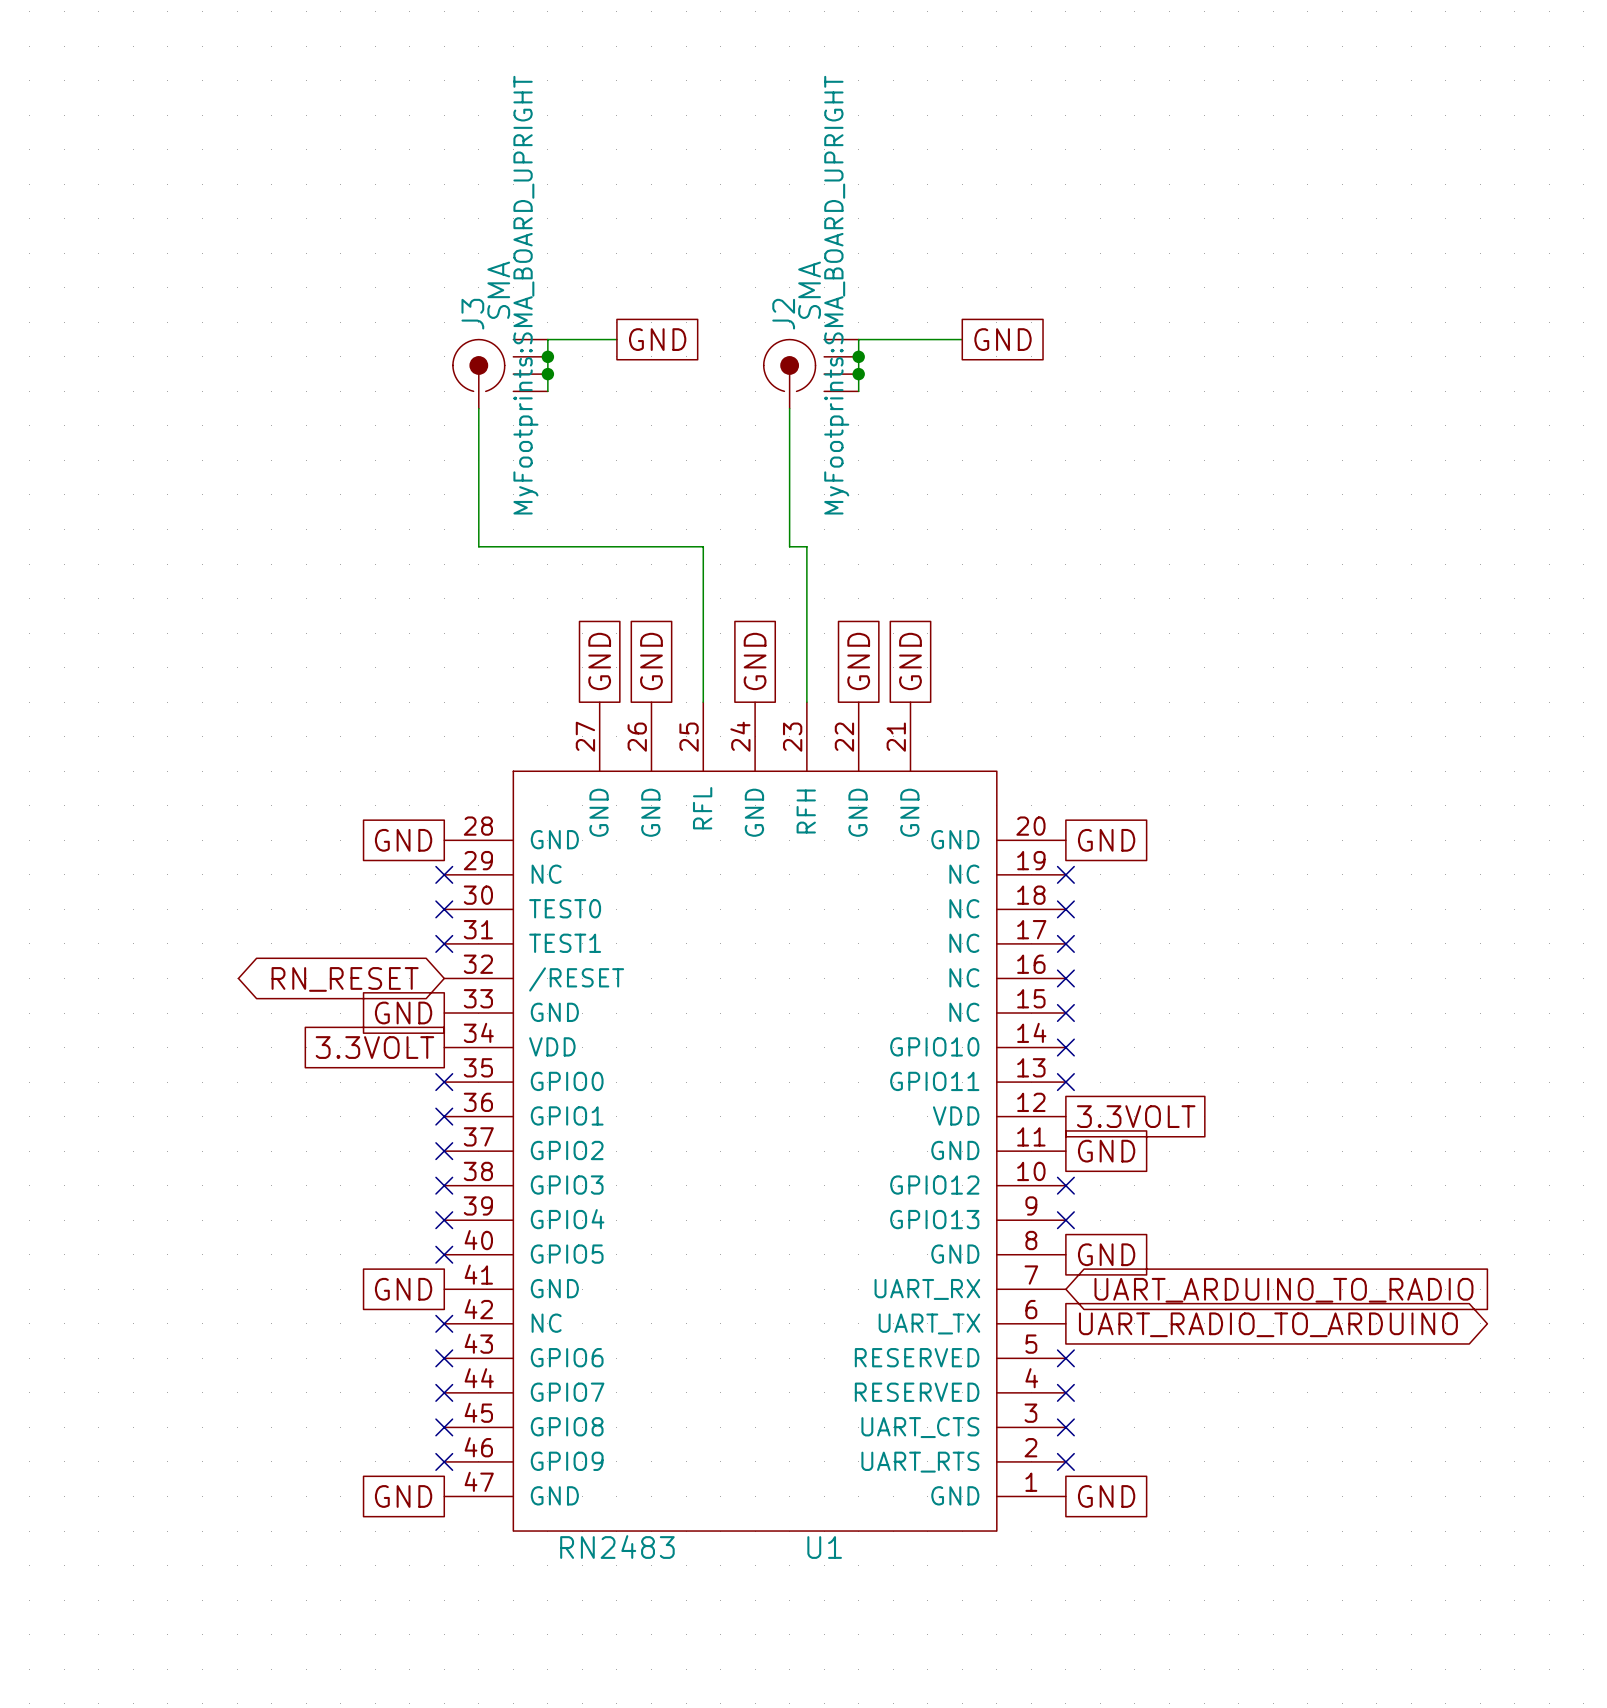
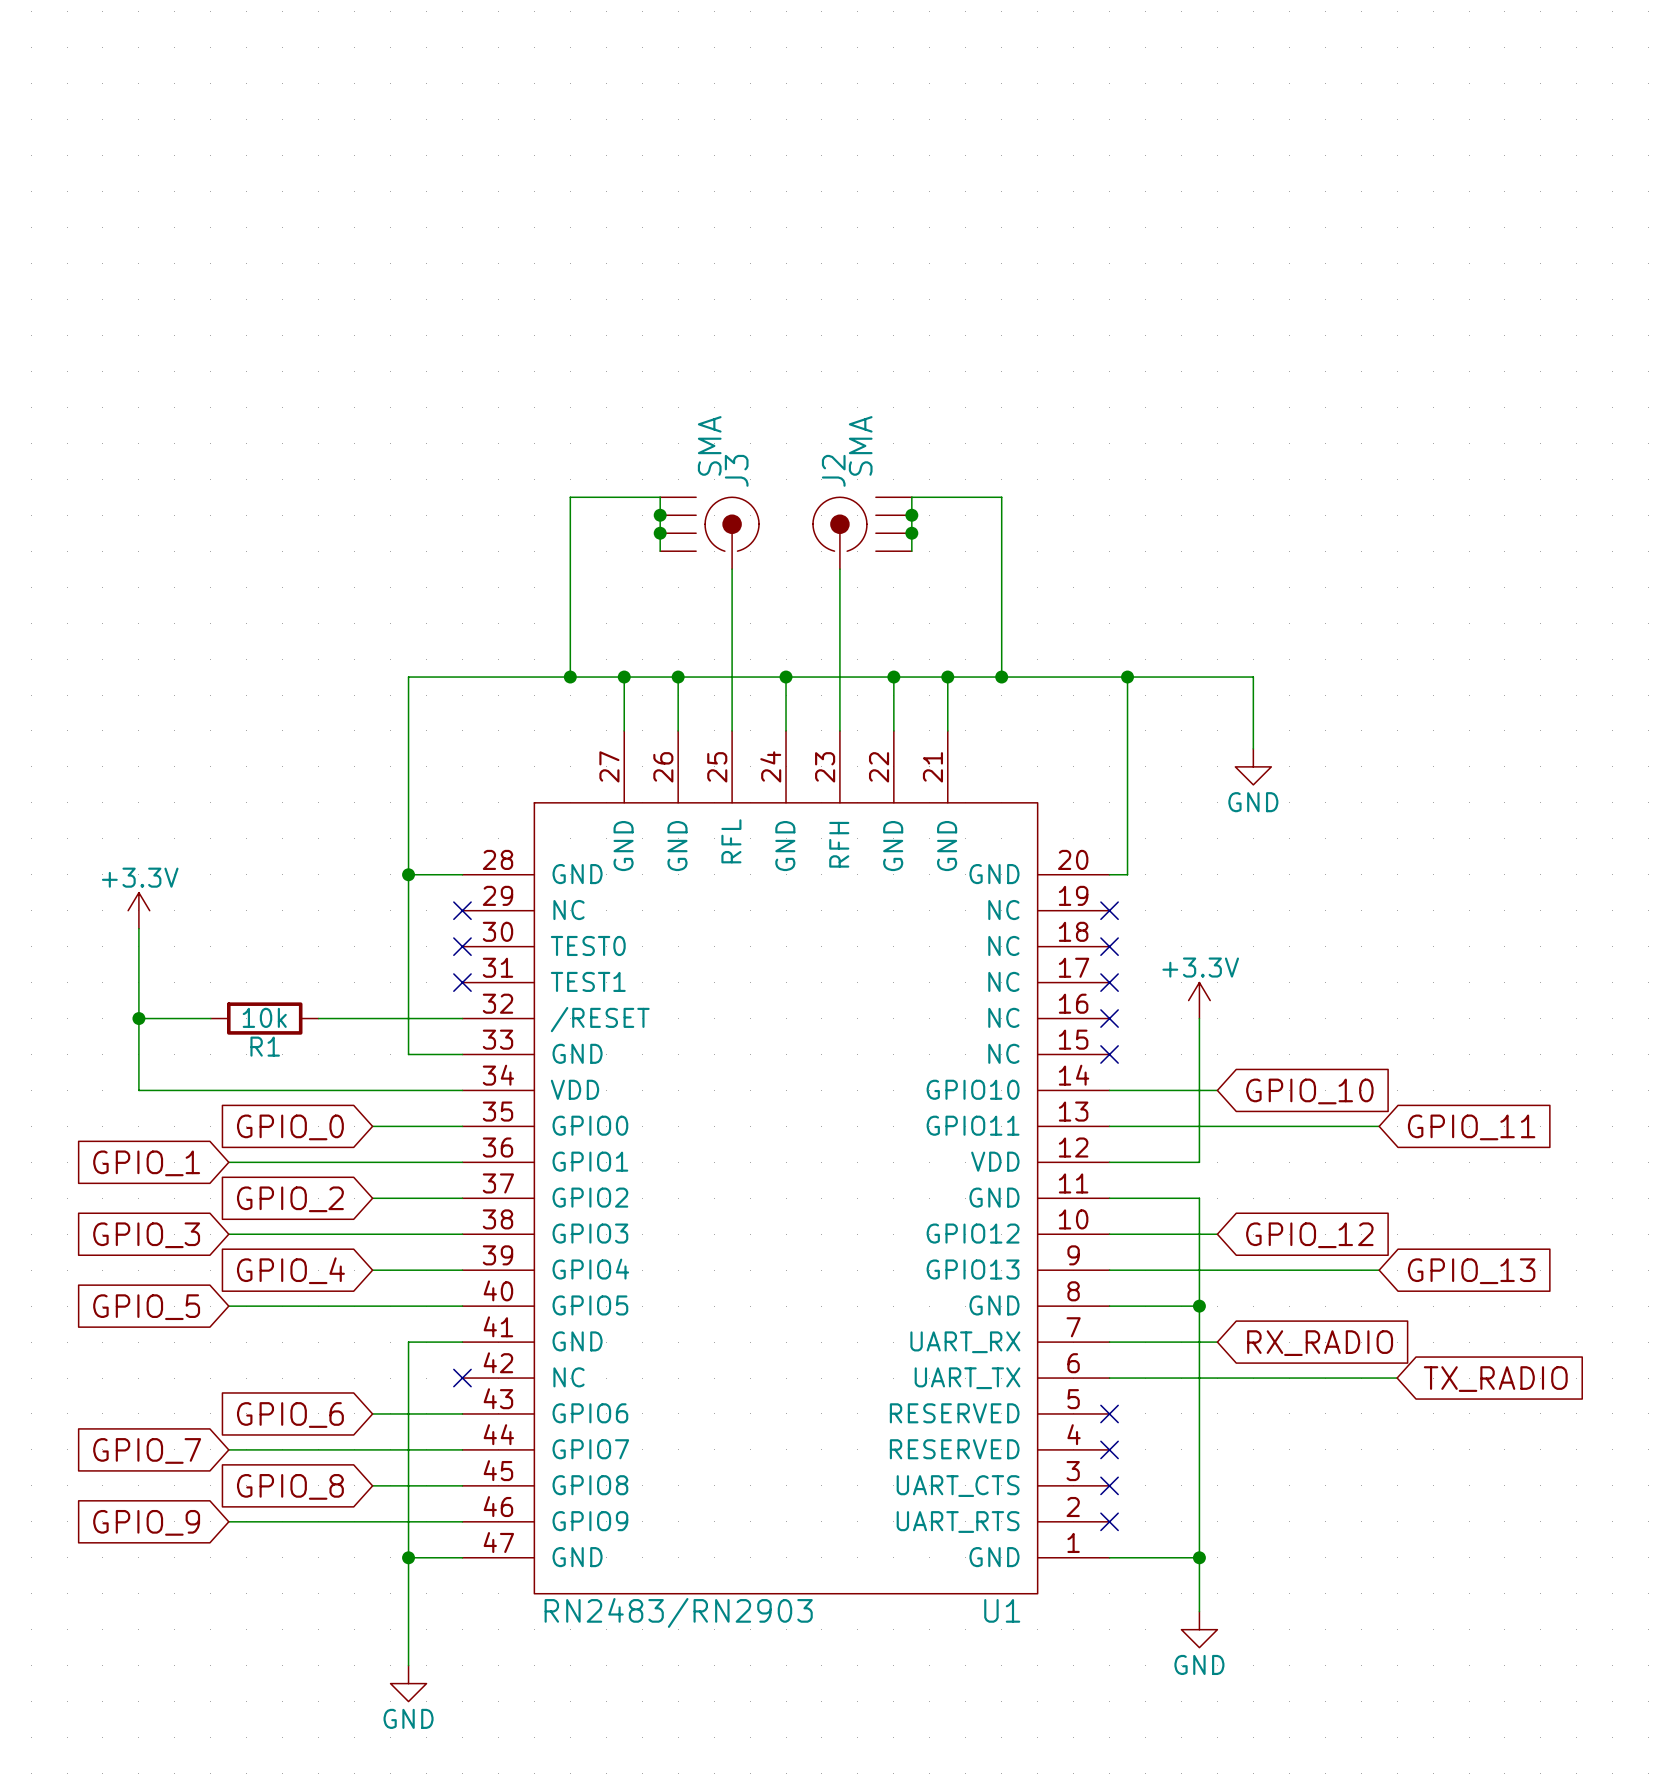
J3 text: MyFootprints:SMA_BOARD_UPRIGHT (525, 295) -> none
J2 text: MyFootprints:SMA_BOARD_UPRIGHT (836, 295) -> none
wire: (616, 339) (547, 339) (547, 391) -> none
global label: GND (657, 339) -> none
wire: (962, 339) (858, 339) (858, 391) -> none
global label: GND (1003, 339) -> none
junction: (547, 356) -> none
junction: (858, 356) -> none
J3 flip: as is (478, 365) -> left-right (732, 524)
J3 position: (500, 374) -> (709, 533)
junction: (547, 374) -> none
J2 position: (811, 374) -> (862, 533)
junction: (858, 374) -> none
wire: (478, 408) (478, 546) (703, 546) -> none
wire: (789, 408) (789, 546) (806, 546) -> none
junction: none -> (660, 515)
junction: none -> (911, 515)
junction: none -> (660, 533)
junction: none -> (911, 533)
wire: none -> (660, 551) (660, 497) (570, 497) (570, 677)
wire: none -> (911, 551) (911, 497) (1001, 497) (1001, 677)
junction: none -> (570, 677)
wire: none -> (624, 677) (624, 730)
junction: none -> (624, 677)
wire: none -> (678, 677) (678, 730)
junction: none -> (678, 677)
wire: none -> (786, 677) (786, 730)
junction: none -> (786, 677)
wire: none -> (893, 677) (893, 730)
junction: none -> (893, 677)
wire: none -> (947, 677) (947, 730)
junction: none -> (947, 677)
junction: none -> (1001, 677)
wire: none -> (1127, 677) (1127, 874) (1109, 874)
junction: none -> (1127, 677)
global label: GND (599, 661) -> none
global label: GND (651, 661) -> none
global label: GND (755, 661) -> none
global label: GND (858, 661) -> none
global label: GND (910, 661) -> none
wire: none -> (1253, 748) (1253, 677) (408, 677) (408, 1054) (462, 1054)
power symbol: none -> GND (1253, 766)
wire: none -> (408, 874) (462, 874)
junction: none -> (408, 874)
global label: GND (403, 840) -> none
global label: GND (1106, 840) -> none
power symbol: none -> +3.3V (138, 910)
wire: none -> (138, 928) (138, 1090) (462, 1090)
power symbol: none -> +3.3V (1199, 1000)
wire: none -> (138, 1018) (210, 1018)
junction: none -> (138, 1018)
R1: none -> 10k (264, 1018)
wire: none -> (318, 1018) (462, 1018)
wire: none -> (1199, 1018) (1199, 1162) (1109, 1162)
global label: RN_RESET (345, 979) -> none
global label: GND (403, 1013) -> none
global label: 3.3VOLT (374, 1047) -> none
wire: none -> (1109, 1090) (1217, 1090)
no-connect mark: (1065, 1047) -> none
global label: none -> GPIO_10 (1309, 1091)
wire: none -> (372, 1126) (462, 1126)
no-connect mark: (444, 1082) -> none
wire: none -> (1109, 1126) (1379, 1126)
no-connect mark: (1065, 1082) -> none
global label: none -> GPIO_0 (290, 1127)
global label: none -> GPIO_11 (1471, 1127)
wire: none -> (228, 1162) (462, 1162)
no-connect mark: (444, 1116) -> none
global label: 3.3VOLT (1136, 1116) -> none
global label: none -> GPIO_1 (146, 1163)
wire: none -> (372, 1198) (462, 1198)
no-connect mark: (444, 1151) -> none
wire: none -> (1109, 1198) (1199, 1198) (1199, 1611)
global label: GND (1106, 1151) -> none
global label: none -> GPIO_2 (290, 1199)
wire: none -> (228, 1234) (462, 1234)
no-connect mark: (444, 1185) -> none
wire: none -> (1109, 1234) (1217, 1234)
no-connect mark: (1065, 1185) -> none
global label: none -> GPIO_3 (146, 1235)
global label: none -> GPIO_12 (1309, 1235)
global label: none -> GPIO_4 (290, 1270)
wire: none -> (372, 1270) (462, 1270)
no-connect mark: (444, 1220) -> none
wire: none -> (1109, 1270) (1379, 1270)
no-connect mark: (1065, 1220) -> none
global label: none -> GPIO_13 (1471, 1271)
wire: none -> (228, 1306) (462, 1306)
no-connect mark: (444, 1254) -> none
wire: none -> (1109, 1306) (1199, 1306)
global label: GND (1106, 1254) -> none
junction: none -> (1199, 1306)
global label: none -> GPIO_5 (146, 1307)
global label: GND (403, 1289) -> none
wire: none -> (462, 1342) (408, 1342) (408, 1665)
wire: none -> (1109, 1342) (1217, 1342)
global label: none -> RX_RADIO (1320, 1343)
global label: UART_ARDUINO_TO_RADIO (1283, 1290) -> none
wire: none -> (1109, 1378) (1397, 1378)
global label: UART_RADIO_TO_ARDUINO (1268, 1324) -> none
global label: none -> TX_RADIO (1495, 1379)
wire: none -> (372, 1413) (462, 1413)
no-connect mark: (444, 1358) -> none
global label: none -> GPIO_6 (290, 1415)
wire: none -> (228, 1449) (462, 1449)
no-connect mark: (444, 1392) -> none
global label: none -> GPIO_7 (147, 1450)
wire: none -> (372, 1485) (462, 1485)
no-connect mark: (444, 1427) -> none
global label: none -> GPIO_8 (290, 1486)
wire: none -> (228, 1521) (462, 1521)
no-connect mark: (444, 1461) -> none
global label: none -> GPIO_9 (146, 1522)
wire: none -> (408, 1557) (462, 1557)
junction: none -> (408, 1557)
global label: GND (403, 1496) -> none
wire: none -> (1109, 1557) (1199, 1557)
global label: GND (1106, 1496) -> none
junction: none -> (1199, 1557)
U1 value: RN2483 (617, 1547) -> RN2483/RN2903 (678, 1612)
U1 name position: U1 (824, 1547) -> U1 (1002, 1610)
power symbol: none -> GND (1199, 1629)
power symbol: none -> GND (408, 1683)

